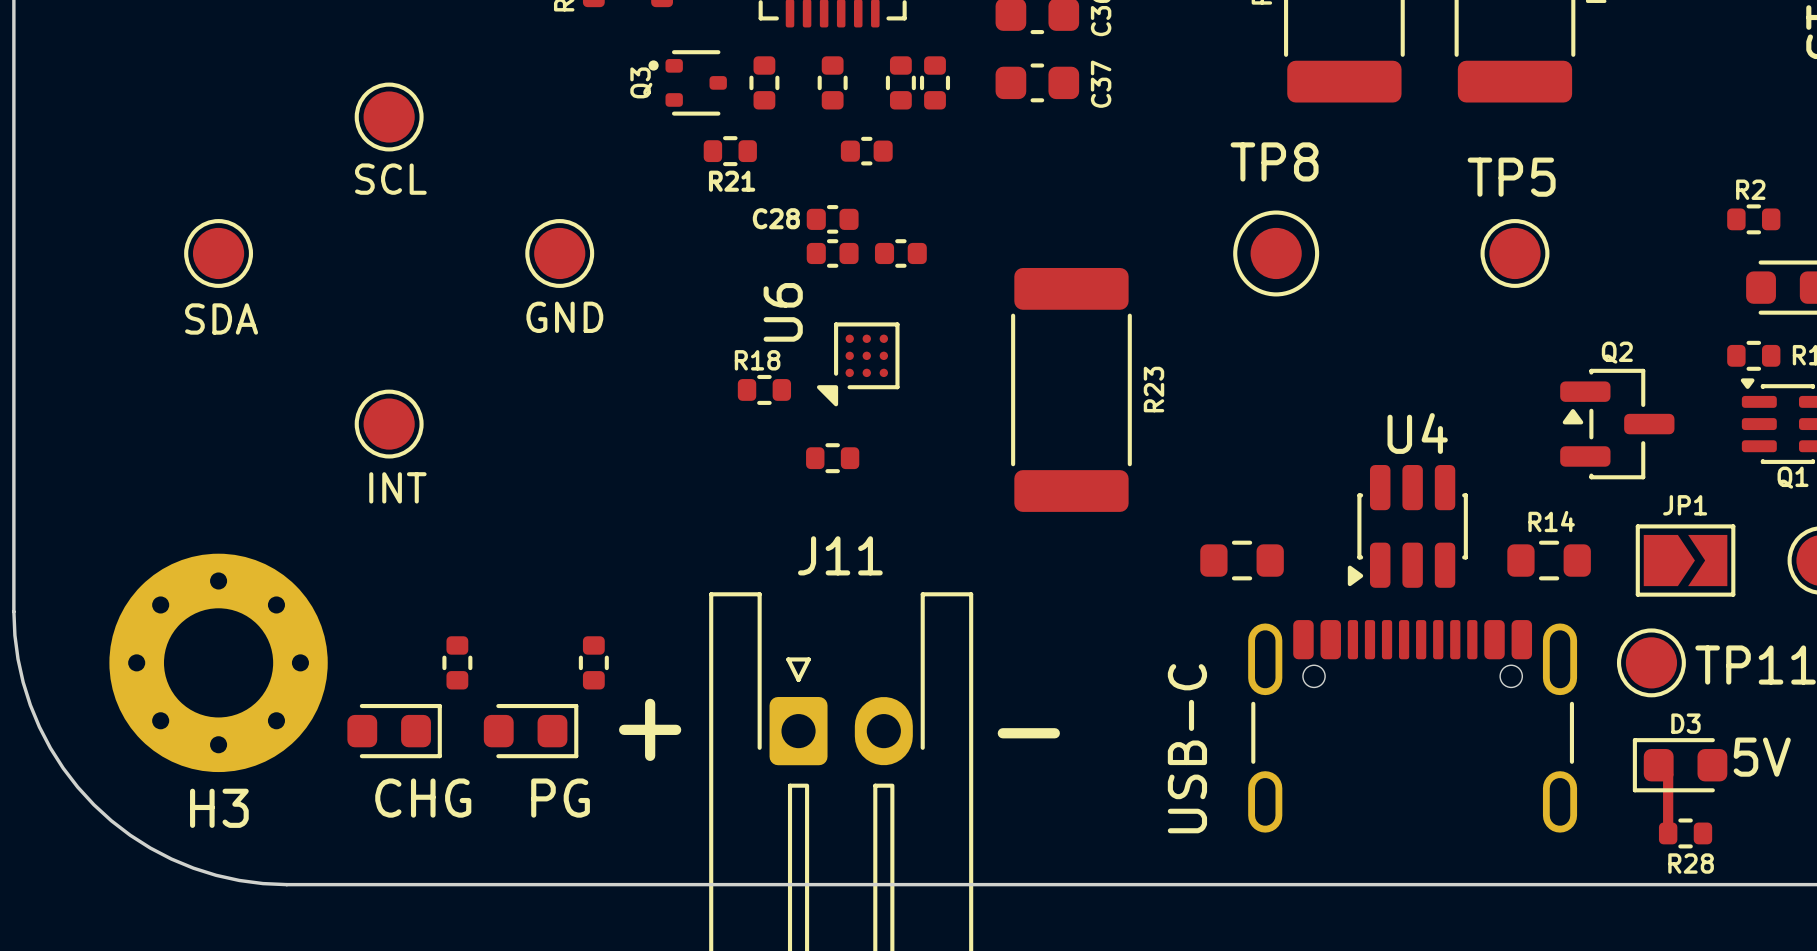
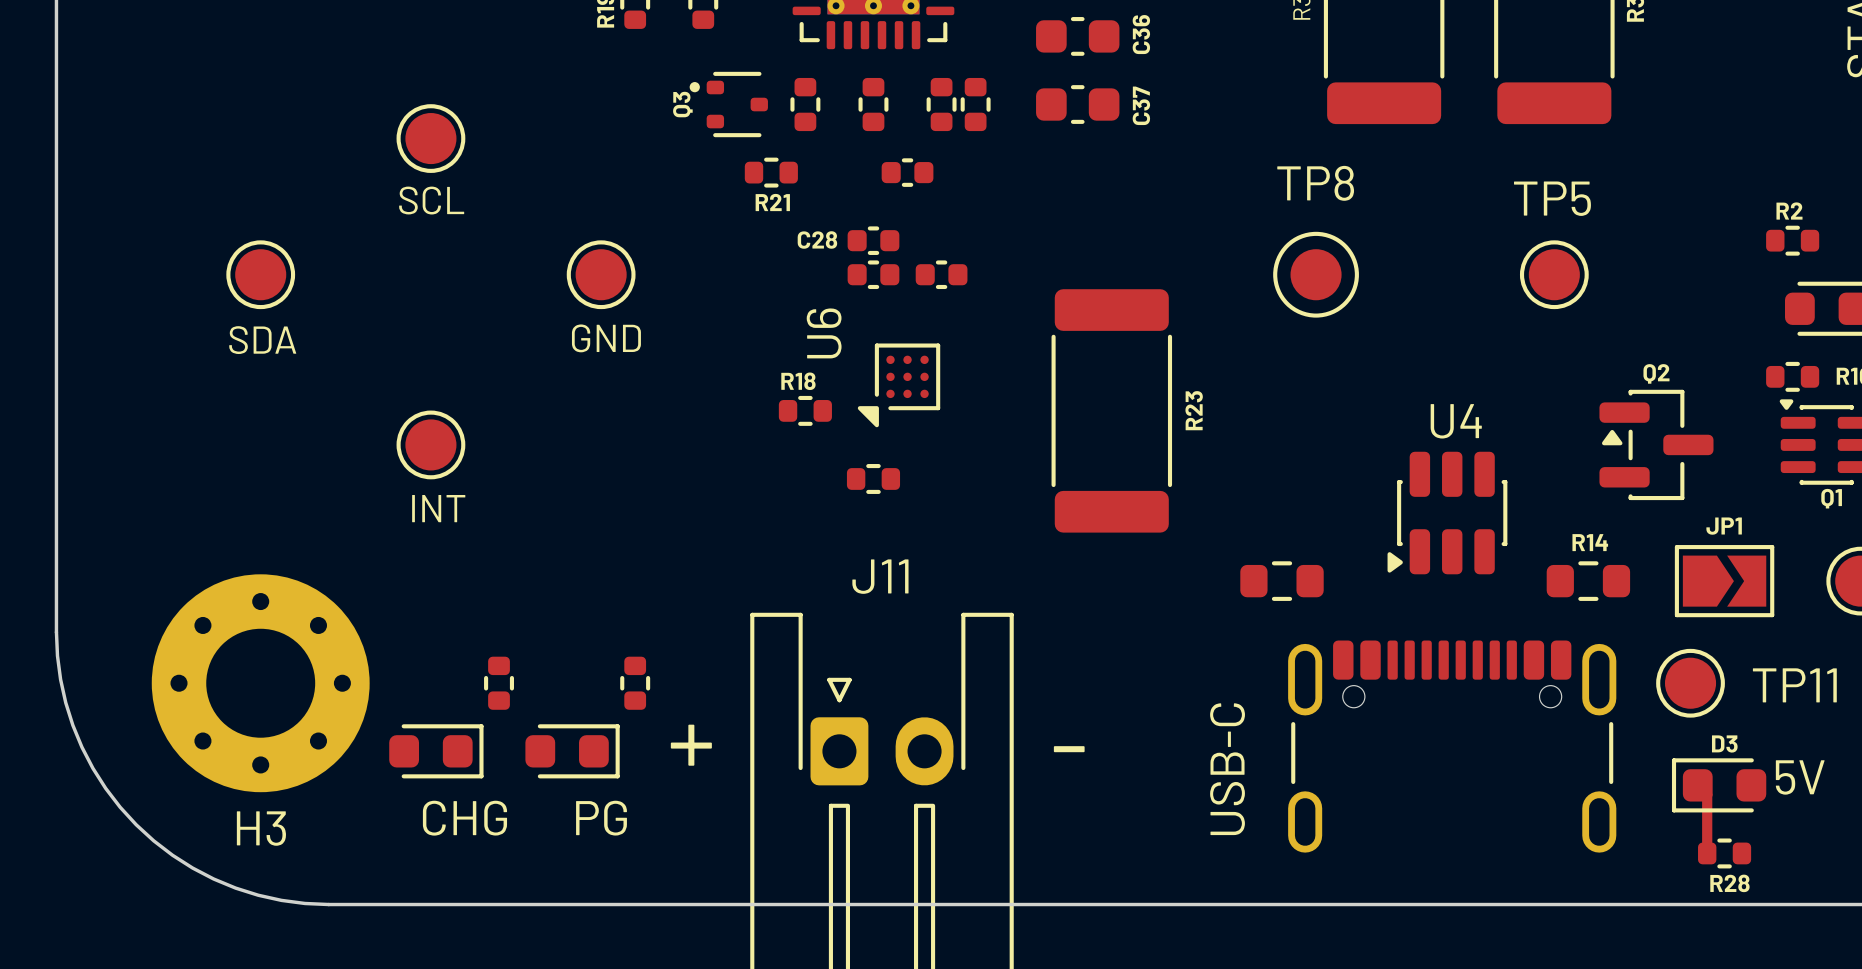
U4 position: (1407, 526) -> (1447, 513)

